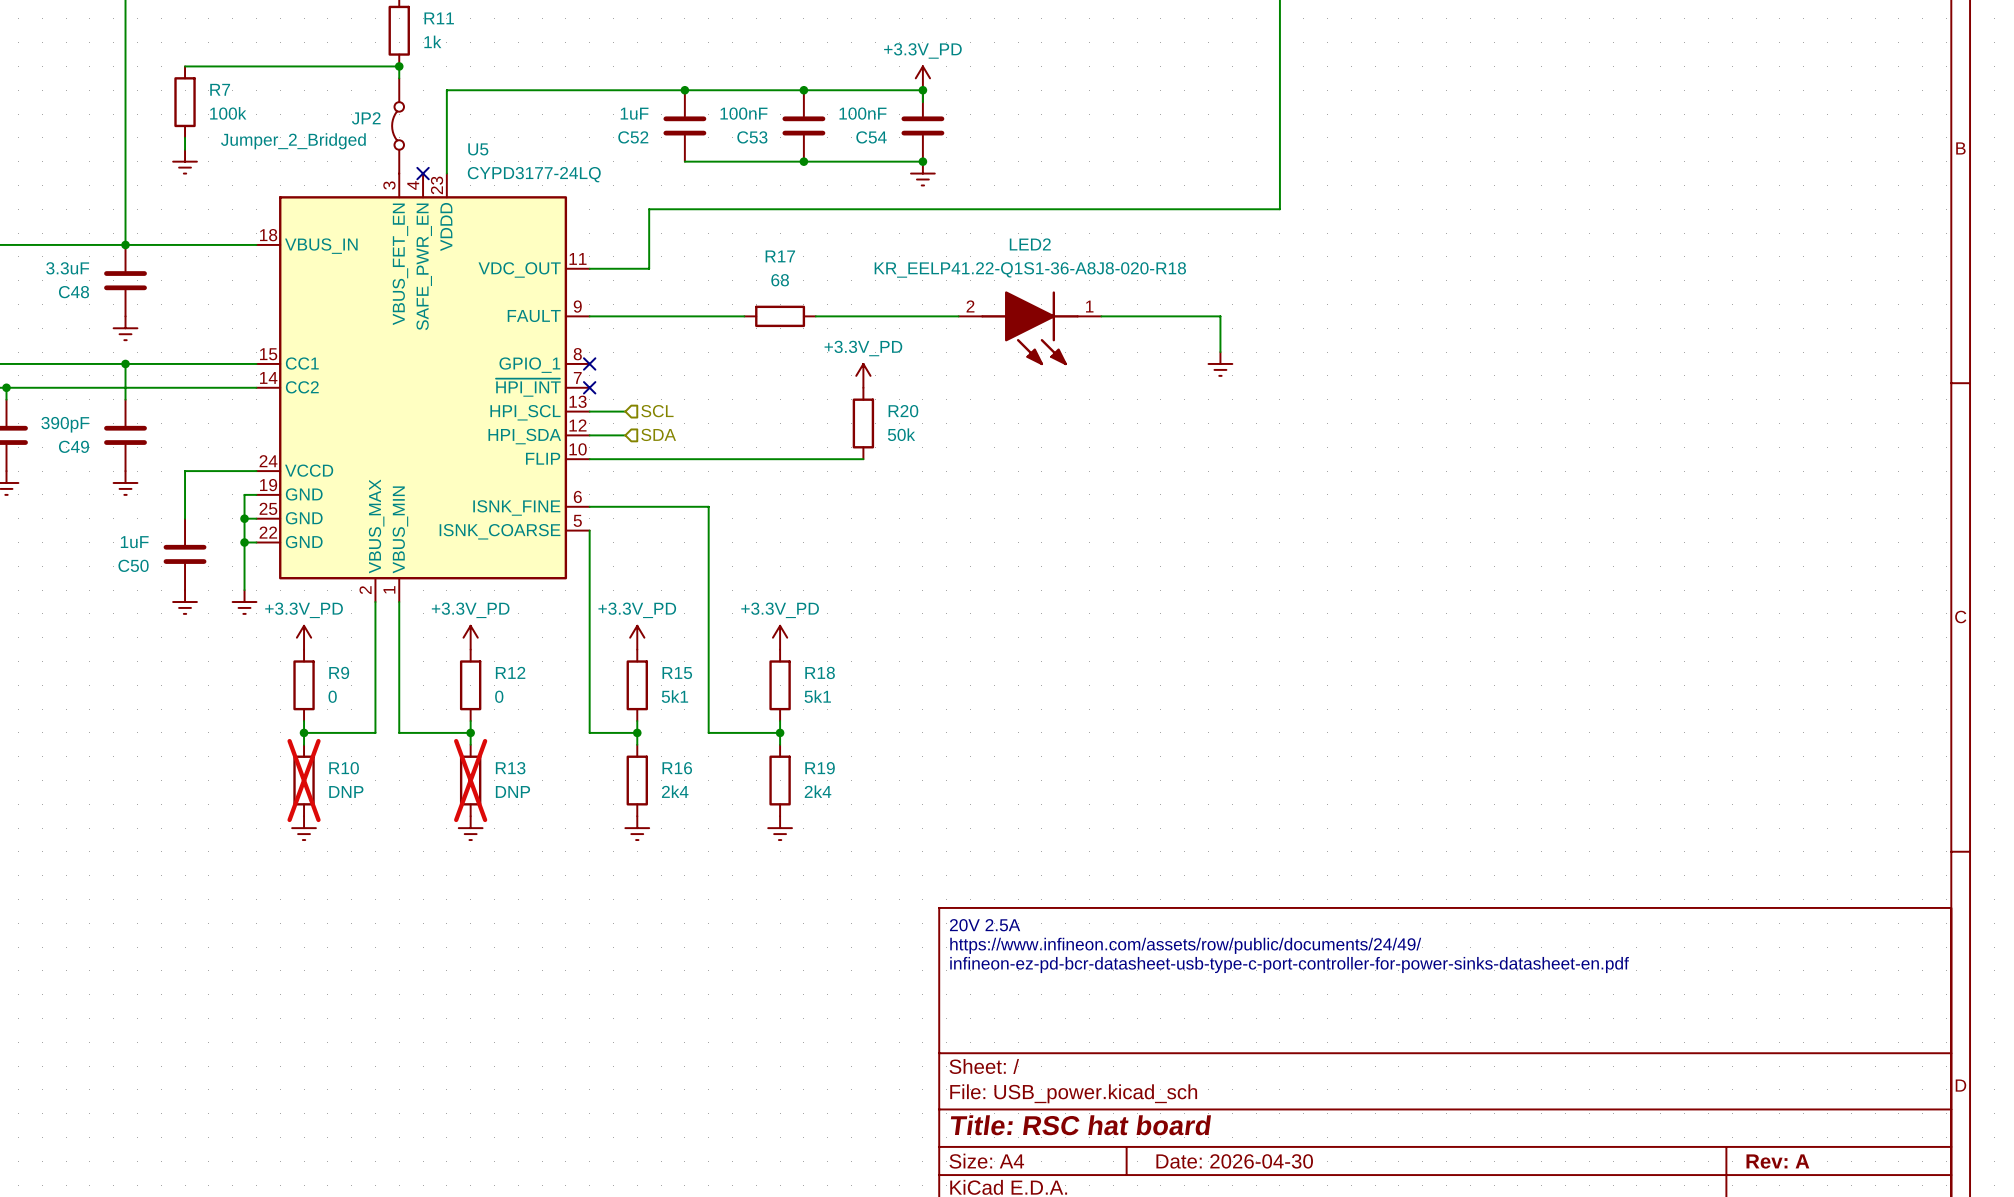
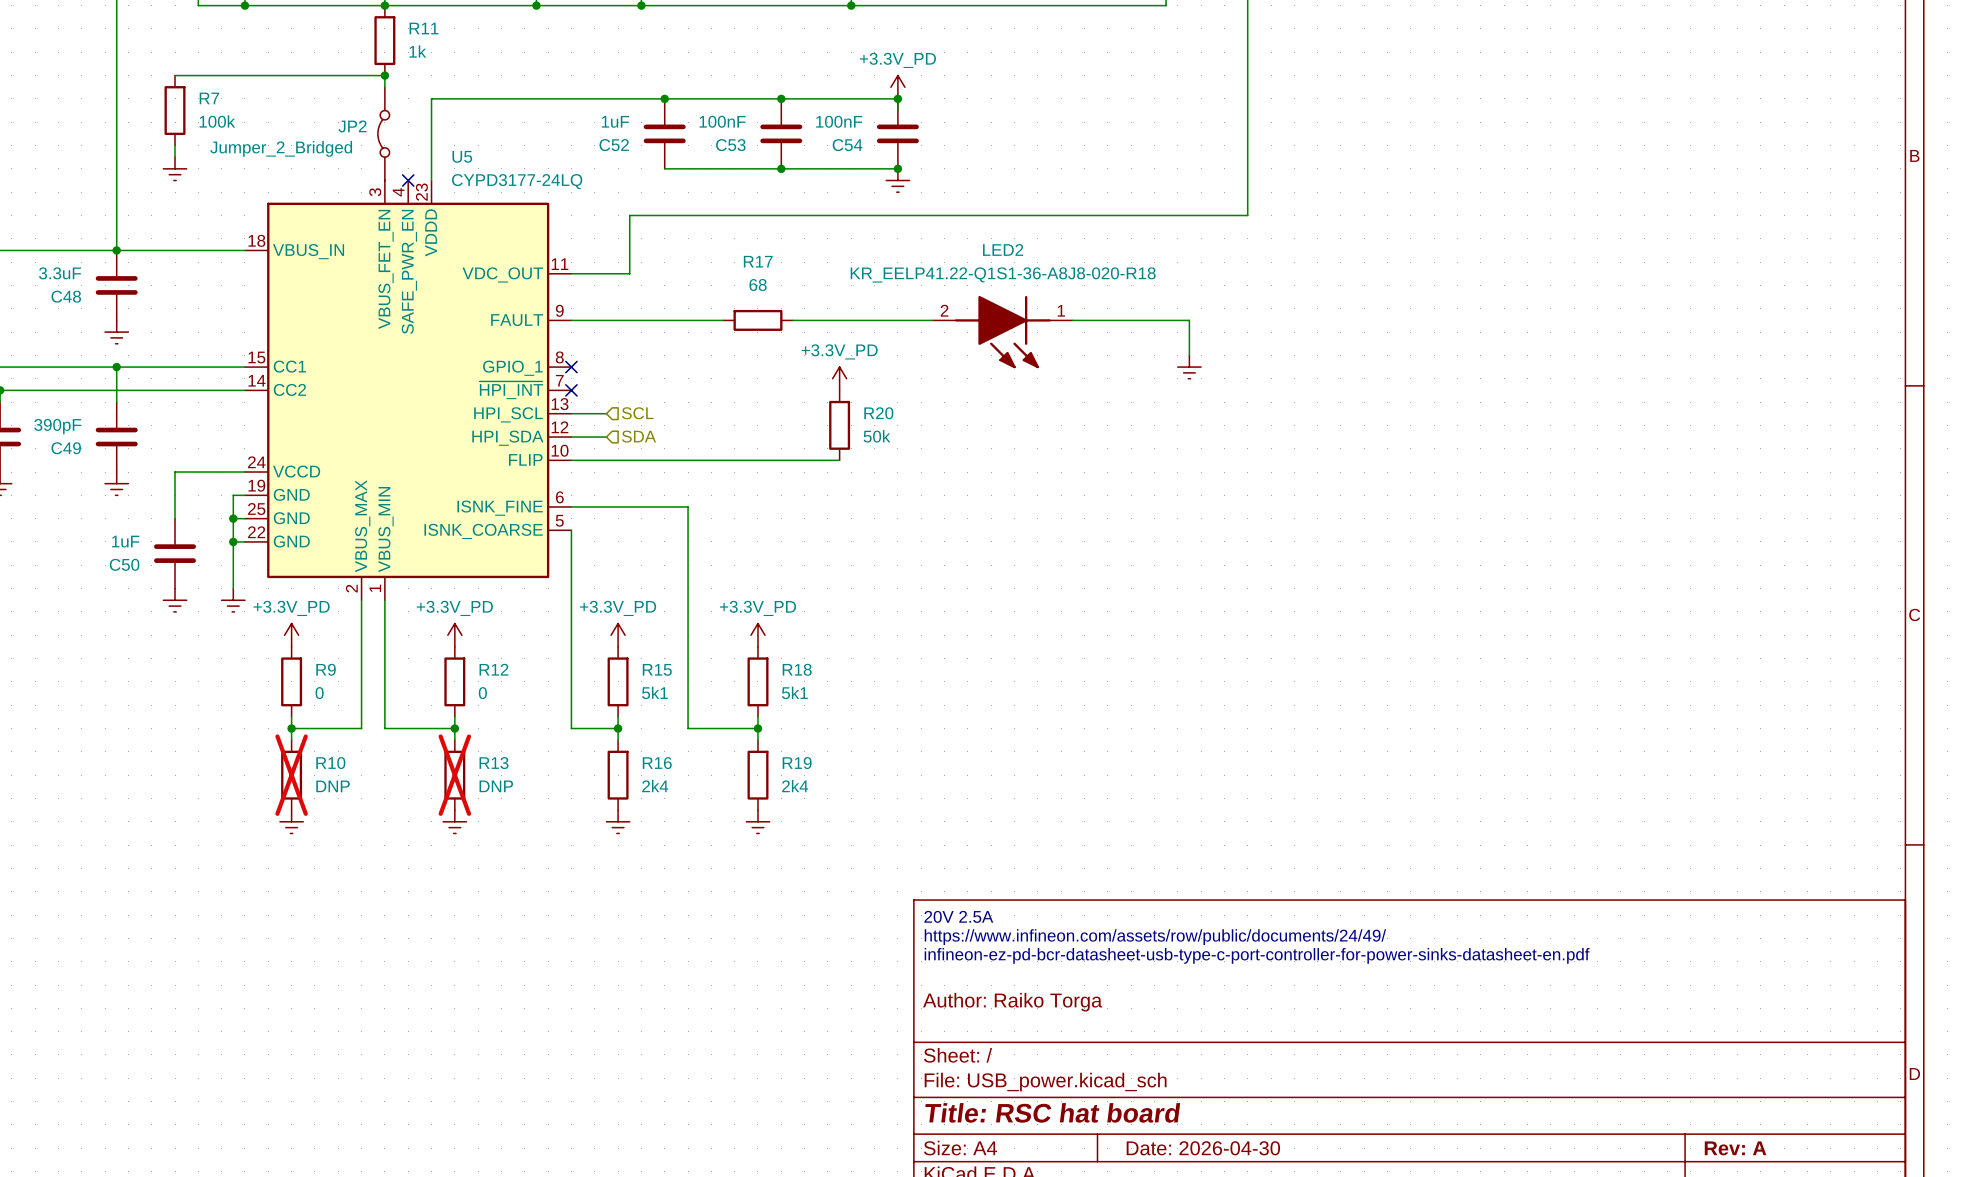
title block: none -> Author: Raiko Torga (1012, 1002)

